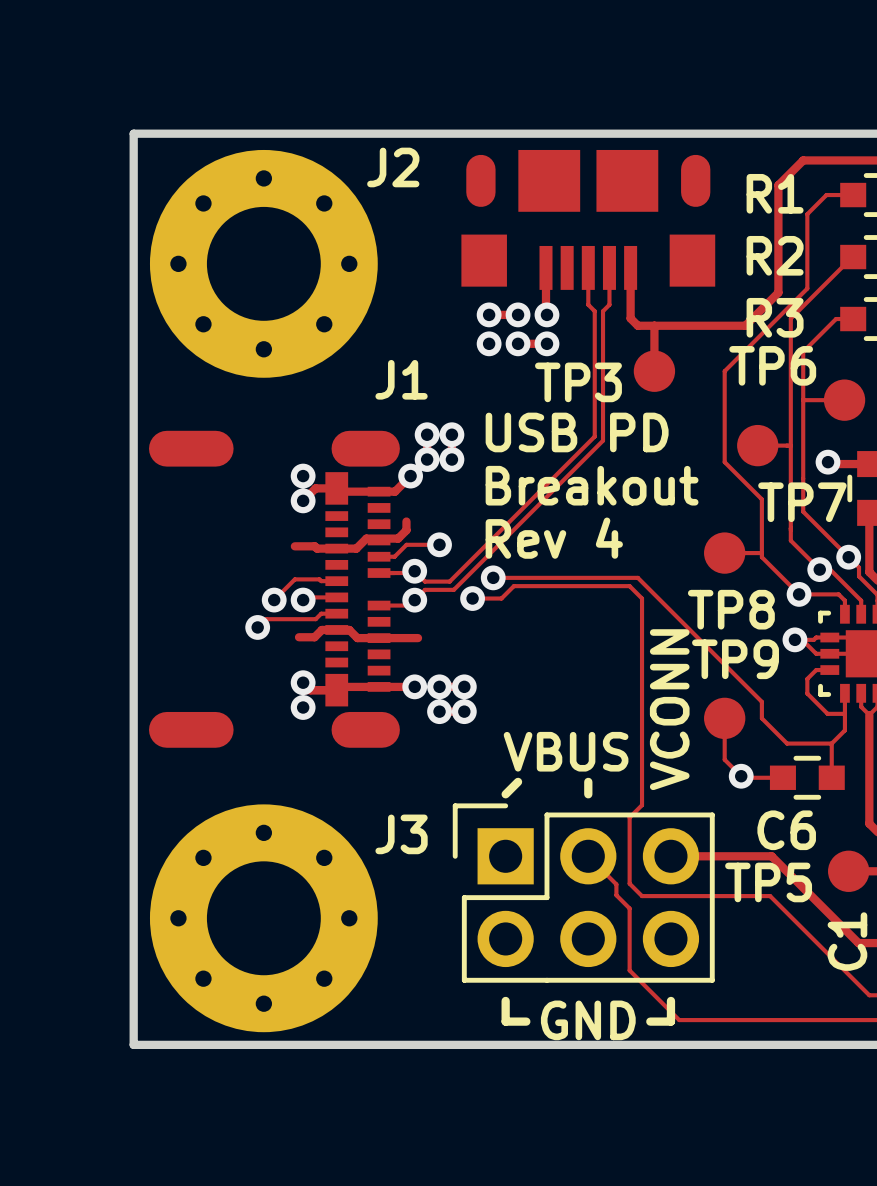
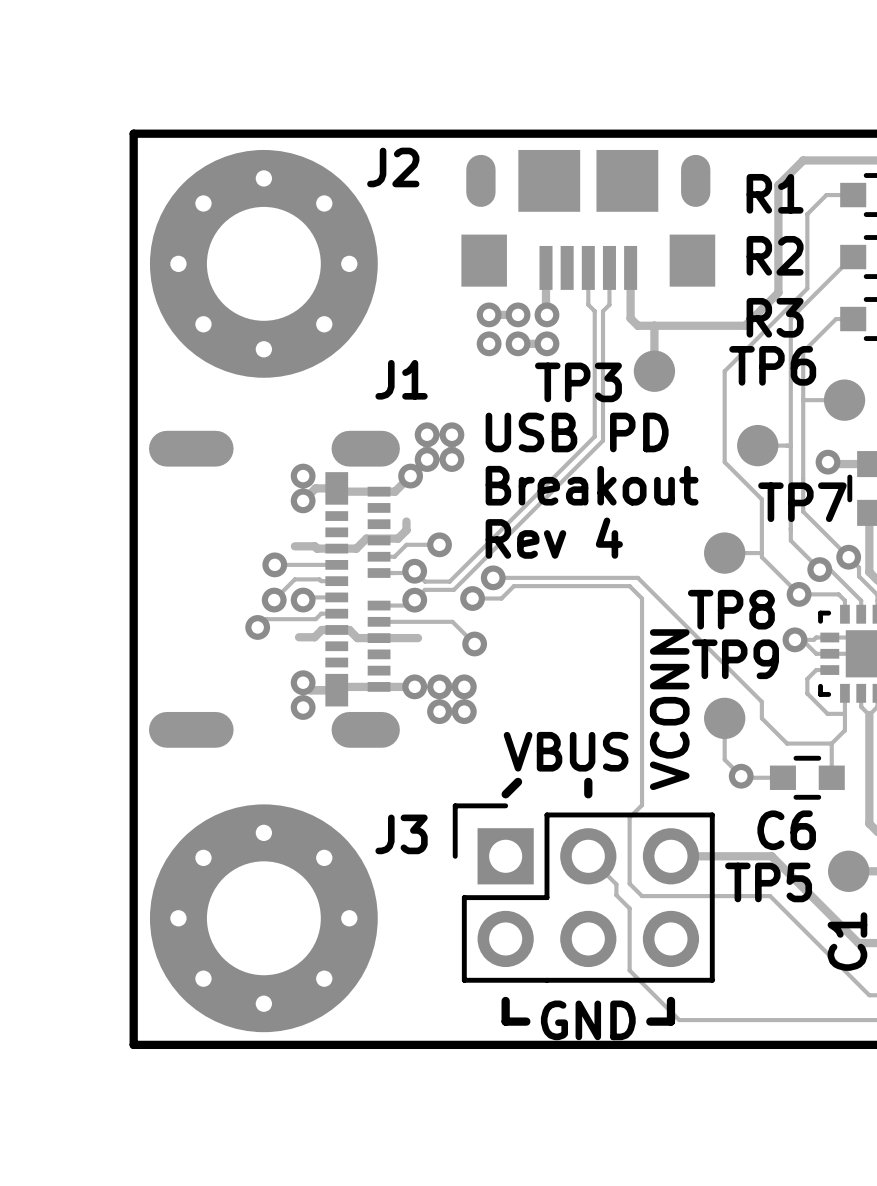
track: none -> (274, 564) (336, 564)
via: none -> (274, 564)
track: none -> (379, 621) (452, 621) (474, 643)
via: none -> (474, 643)

